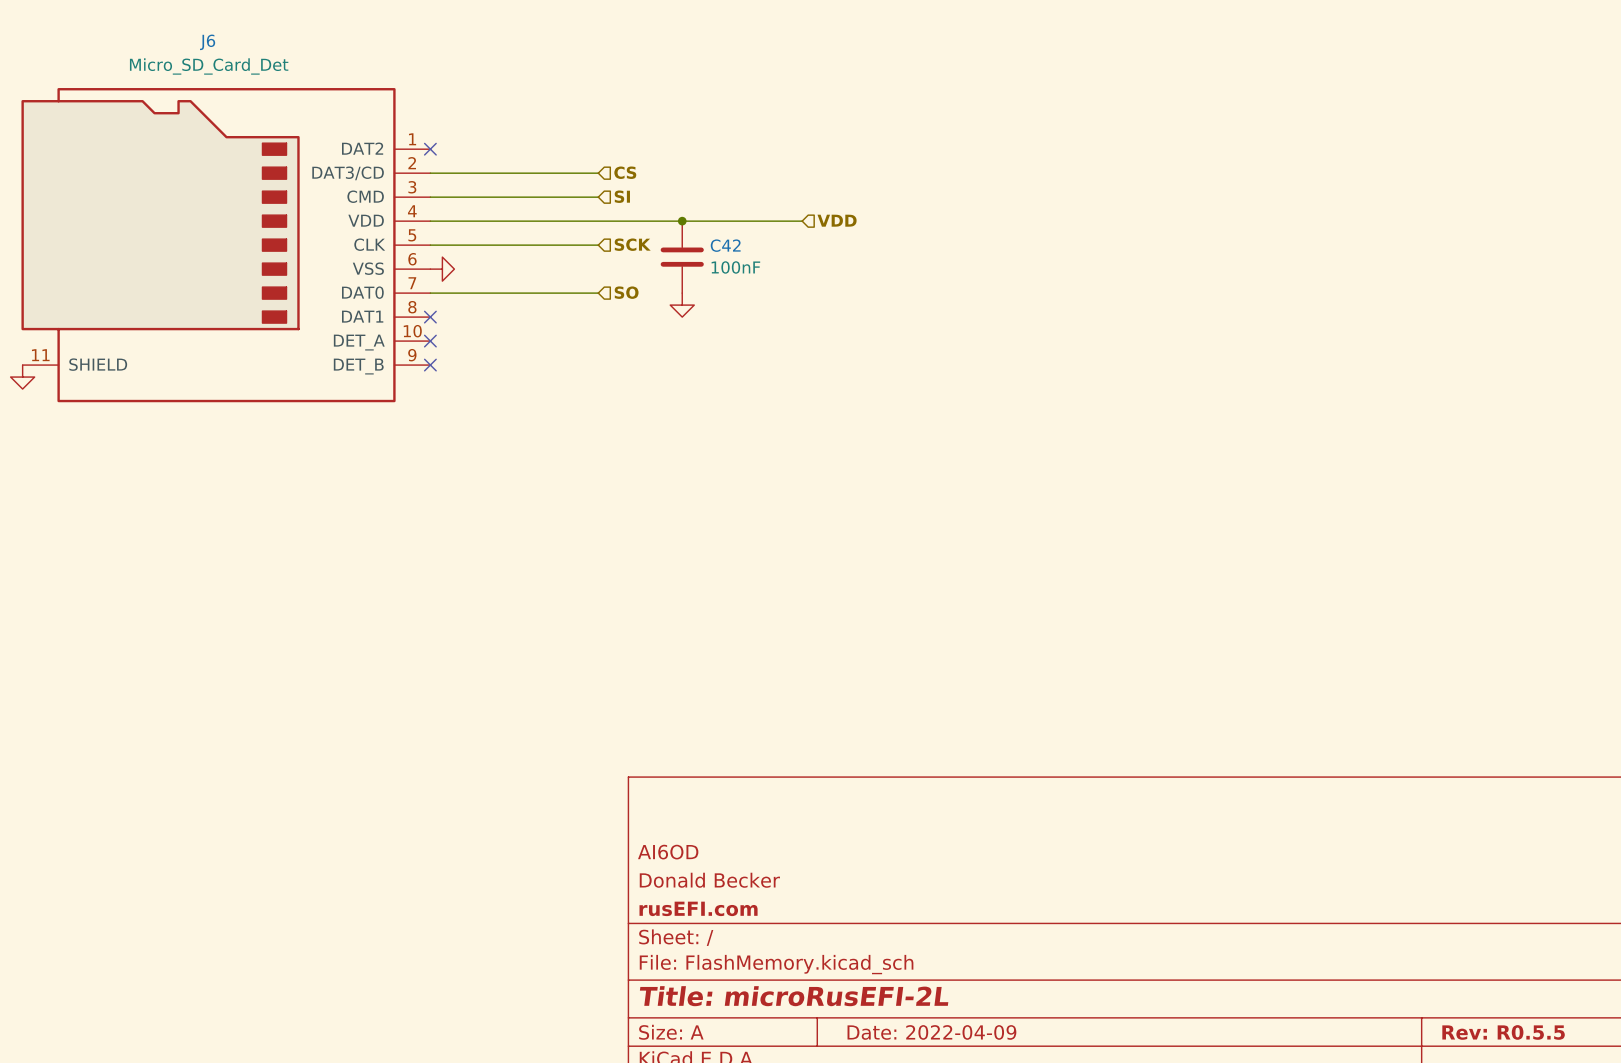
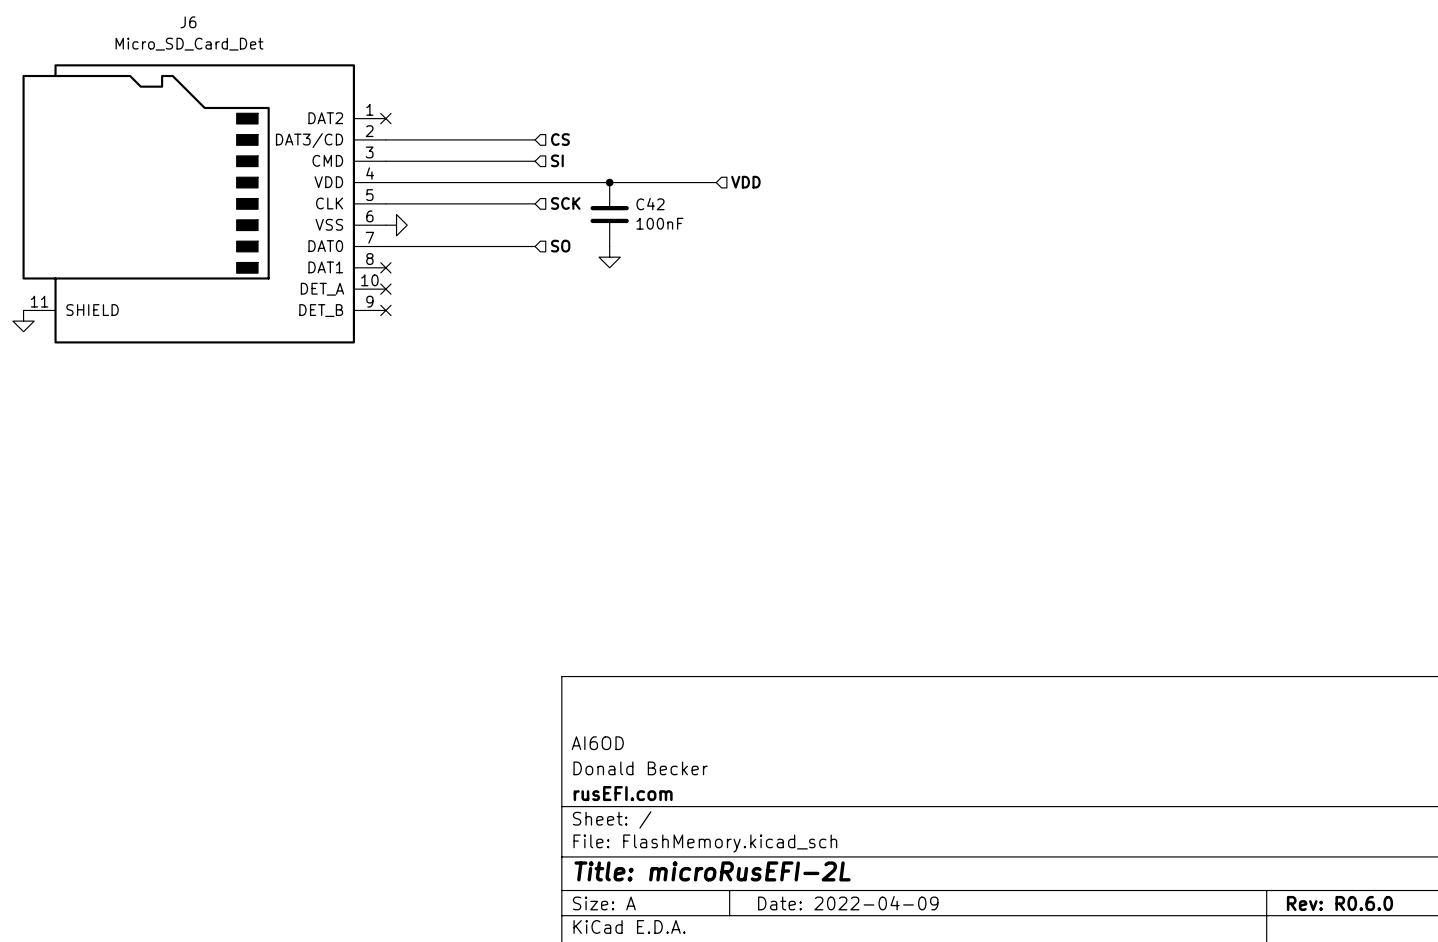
title block: Rev: R0.5.5 (1503, 1032) -> Rev: R0.6.0 (1339, 903)

